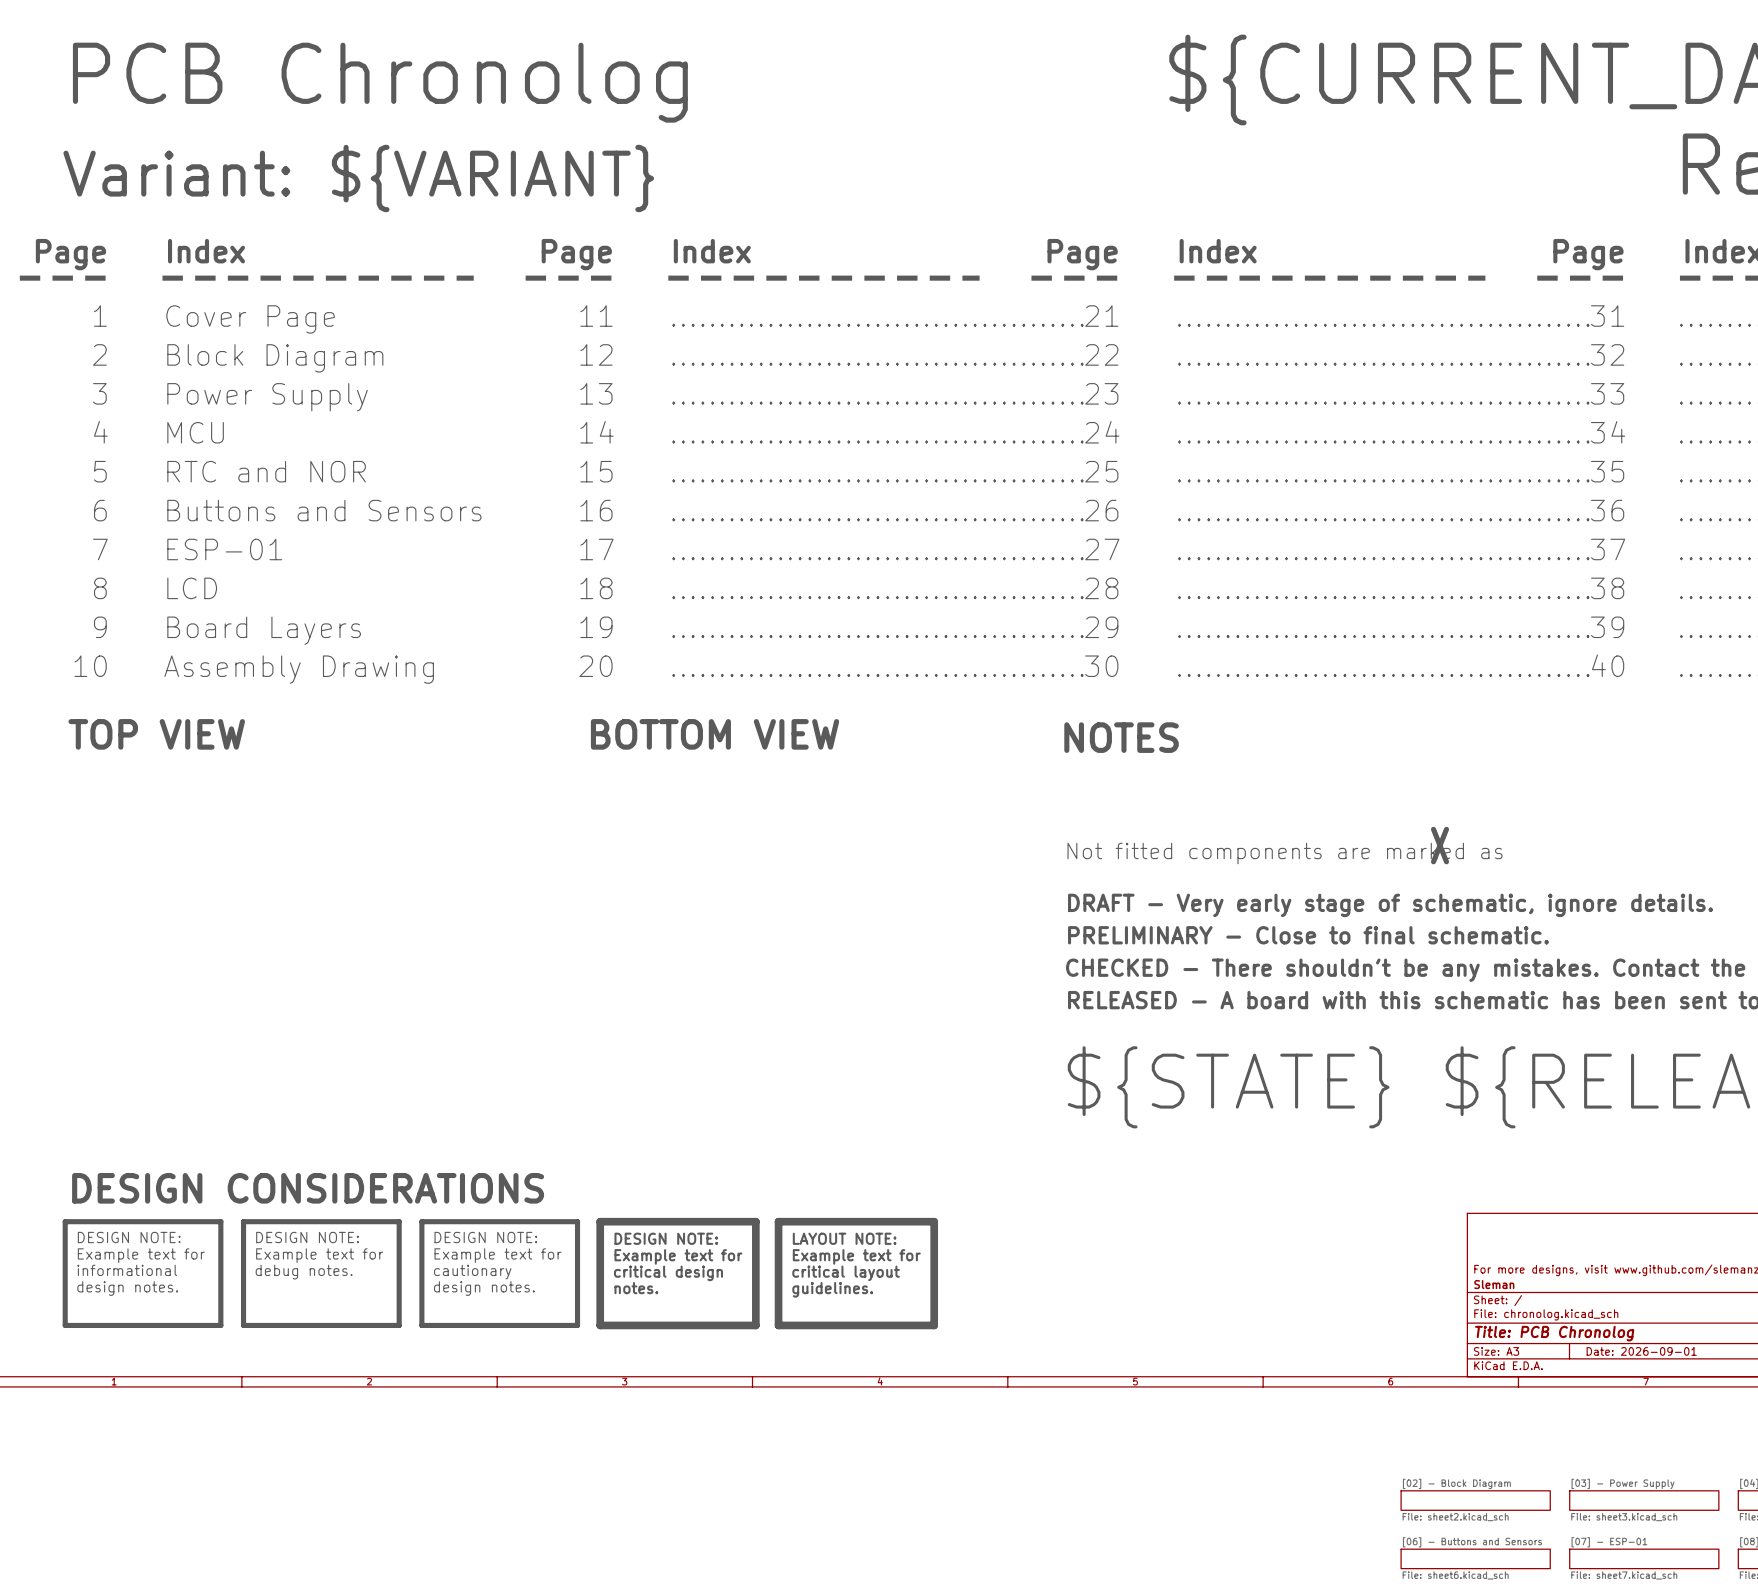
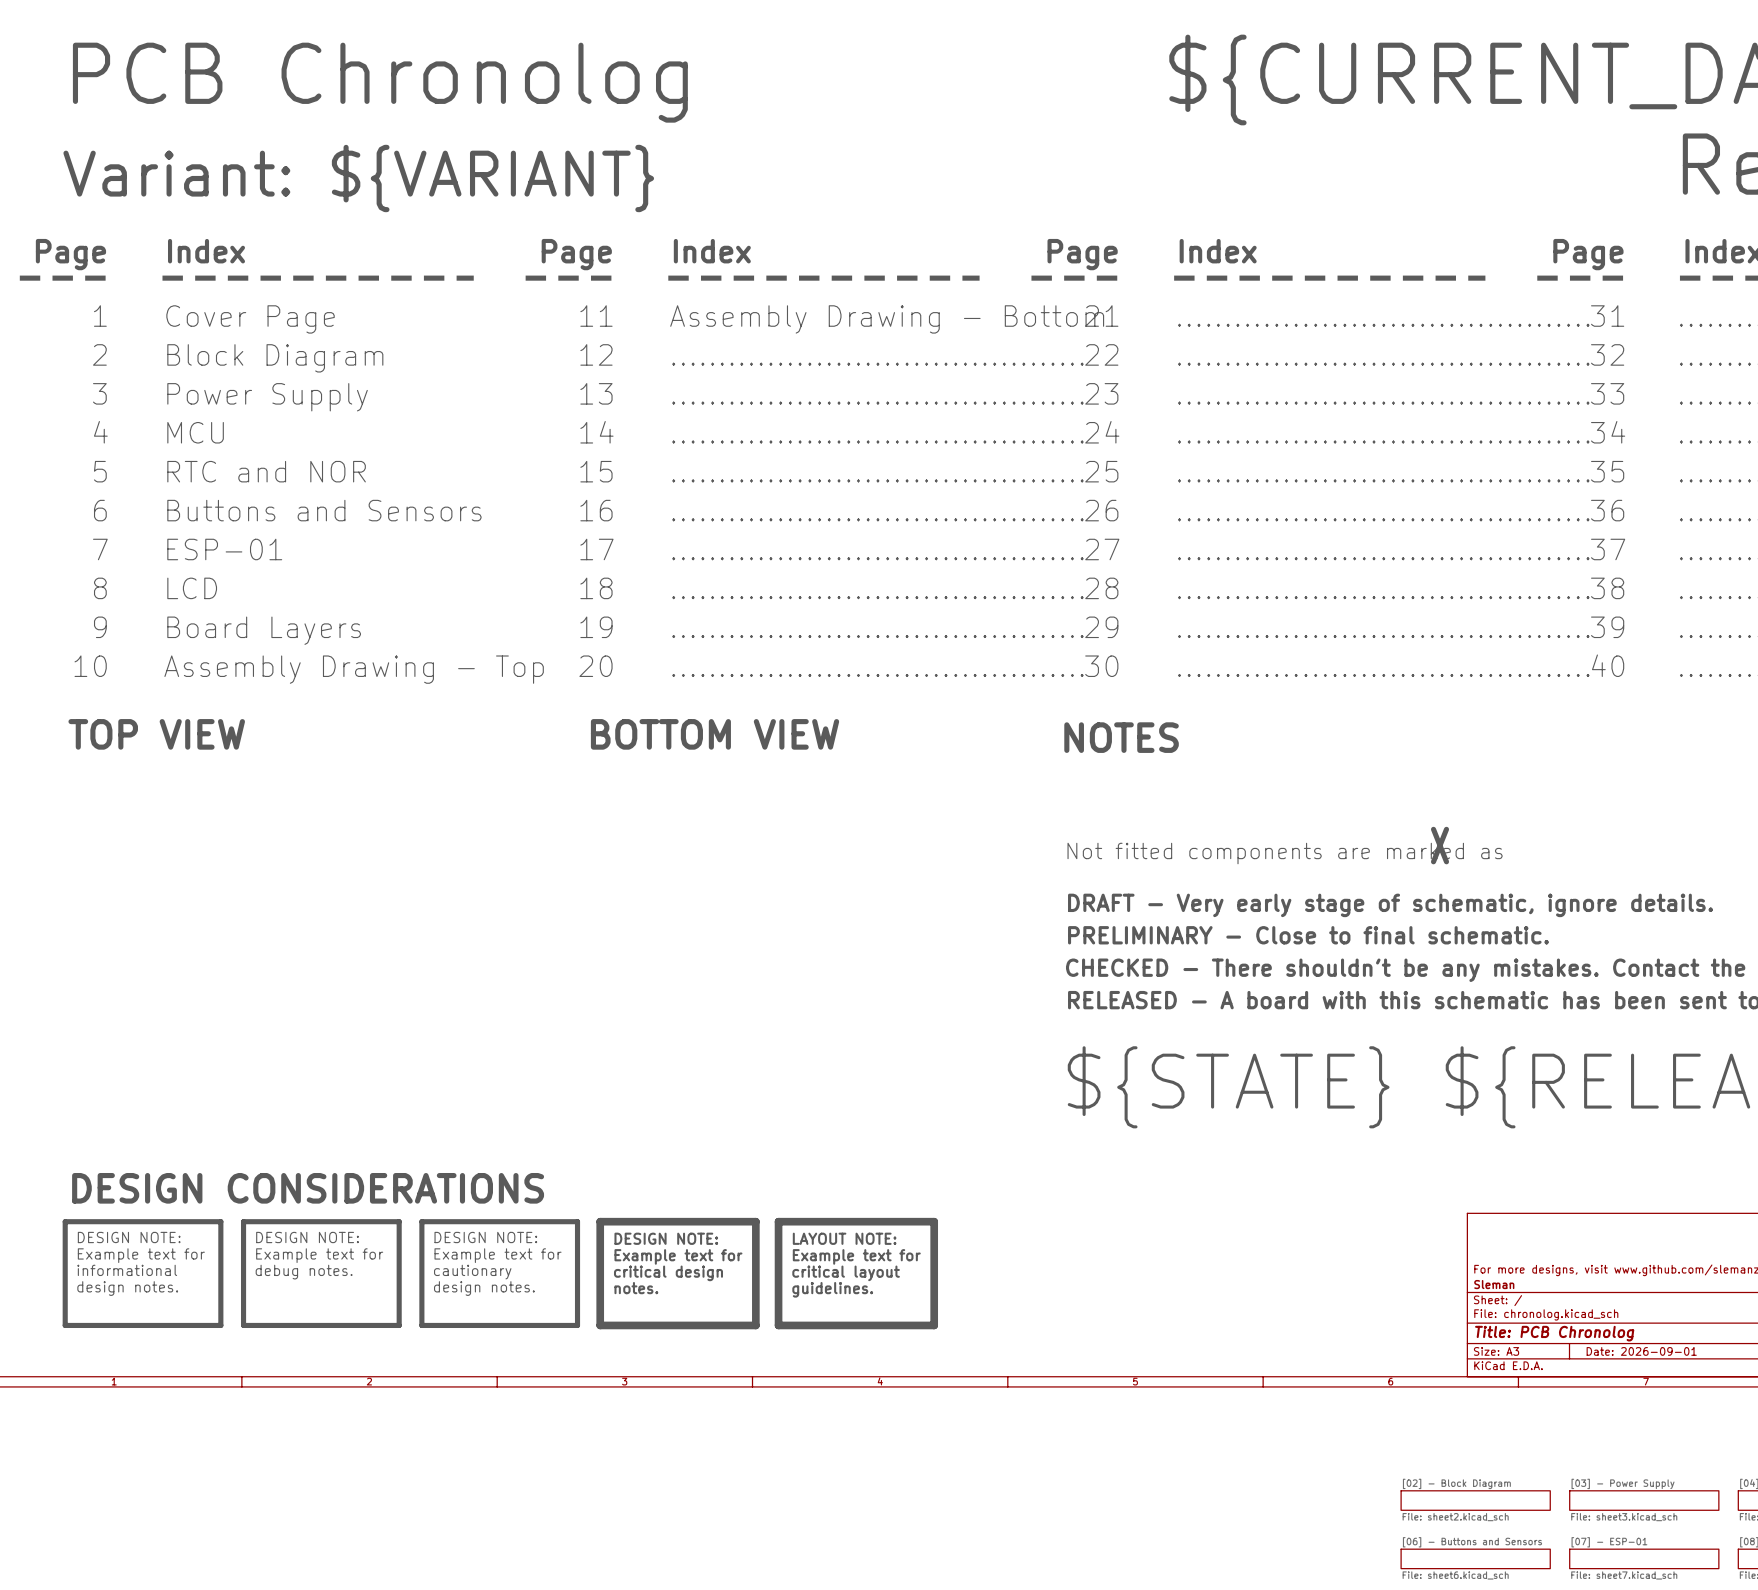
text: ........................................... (877, 325) -> Assembly Drawing - Bottom (887, 319)
text: Assembly Drawing (299, 669) -> Assembly Drawing - Top (354, 669)

